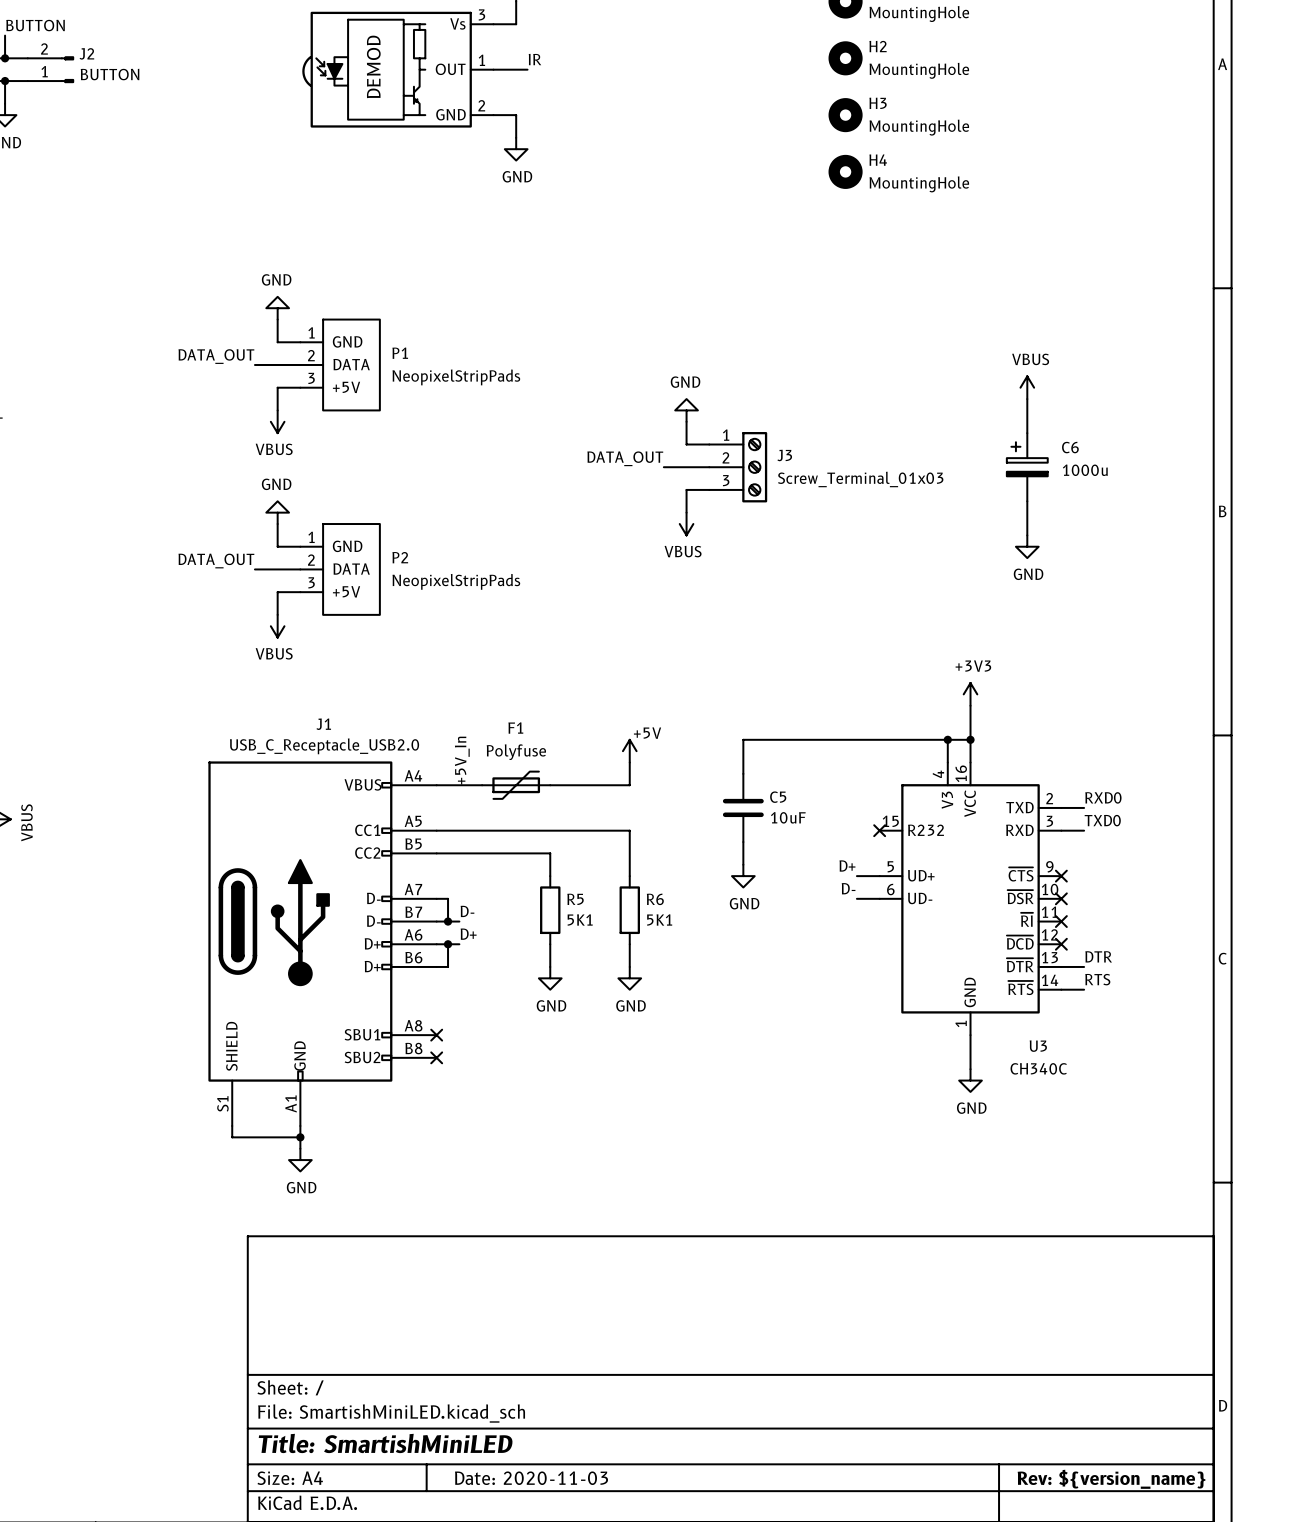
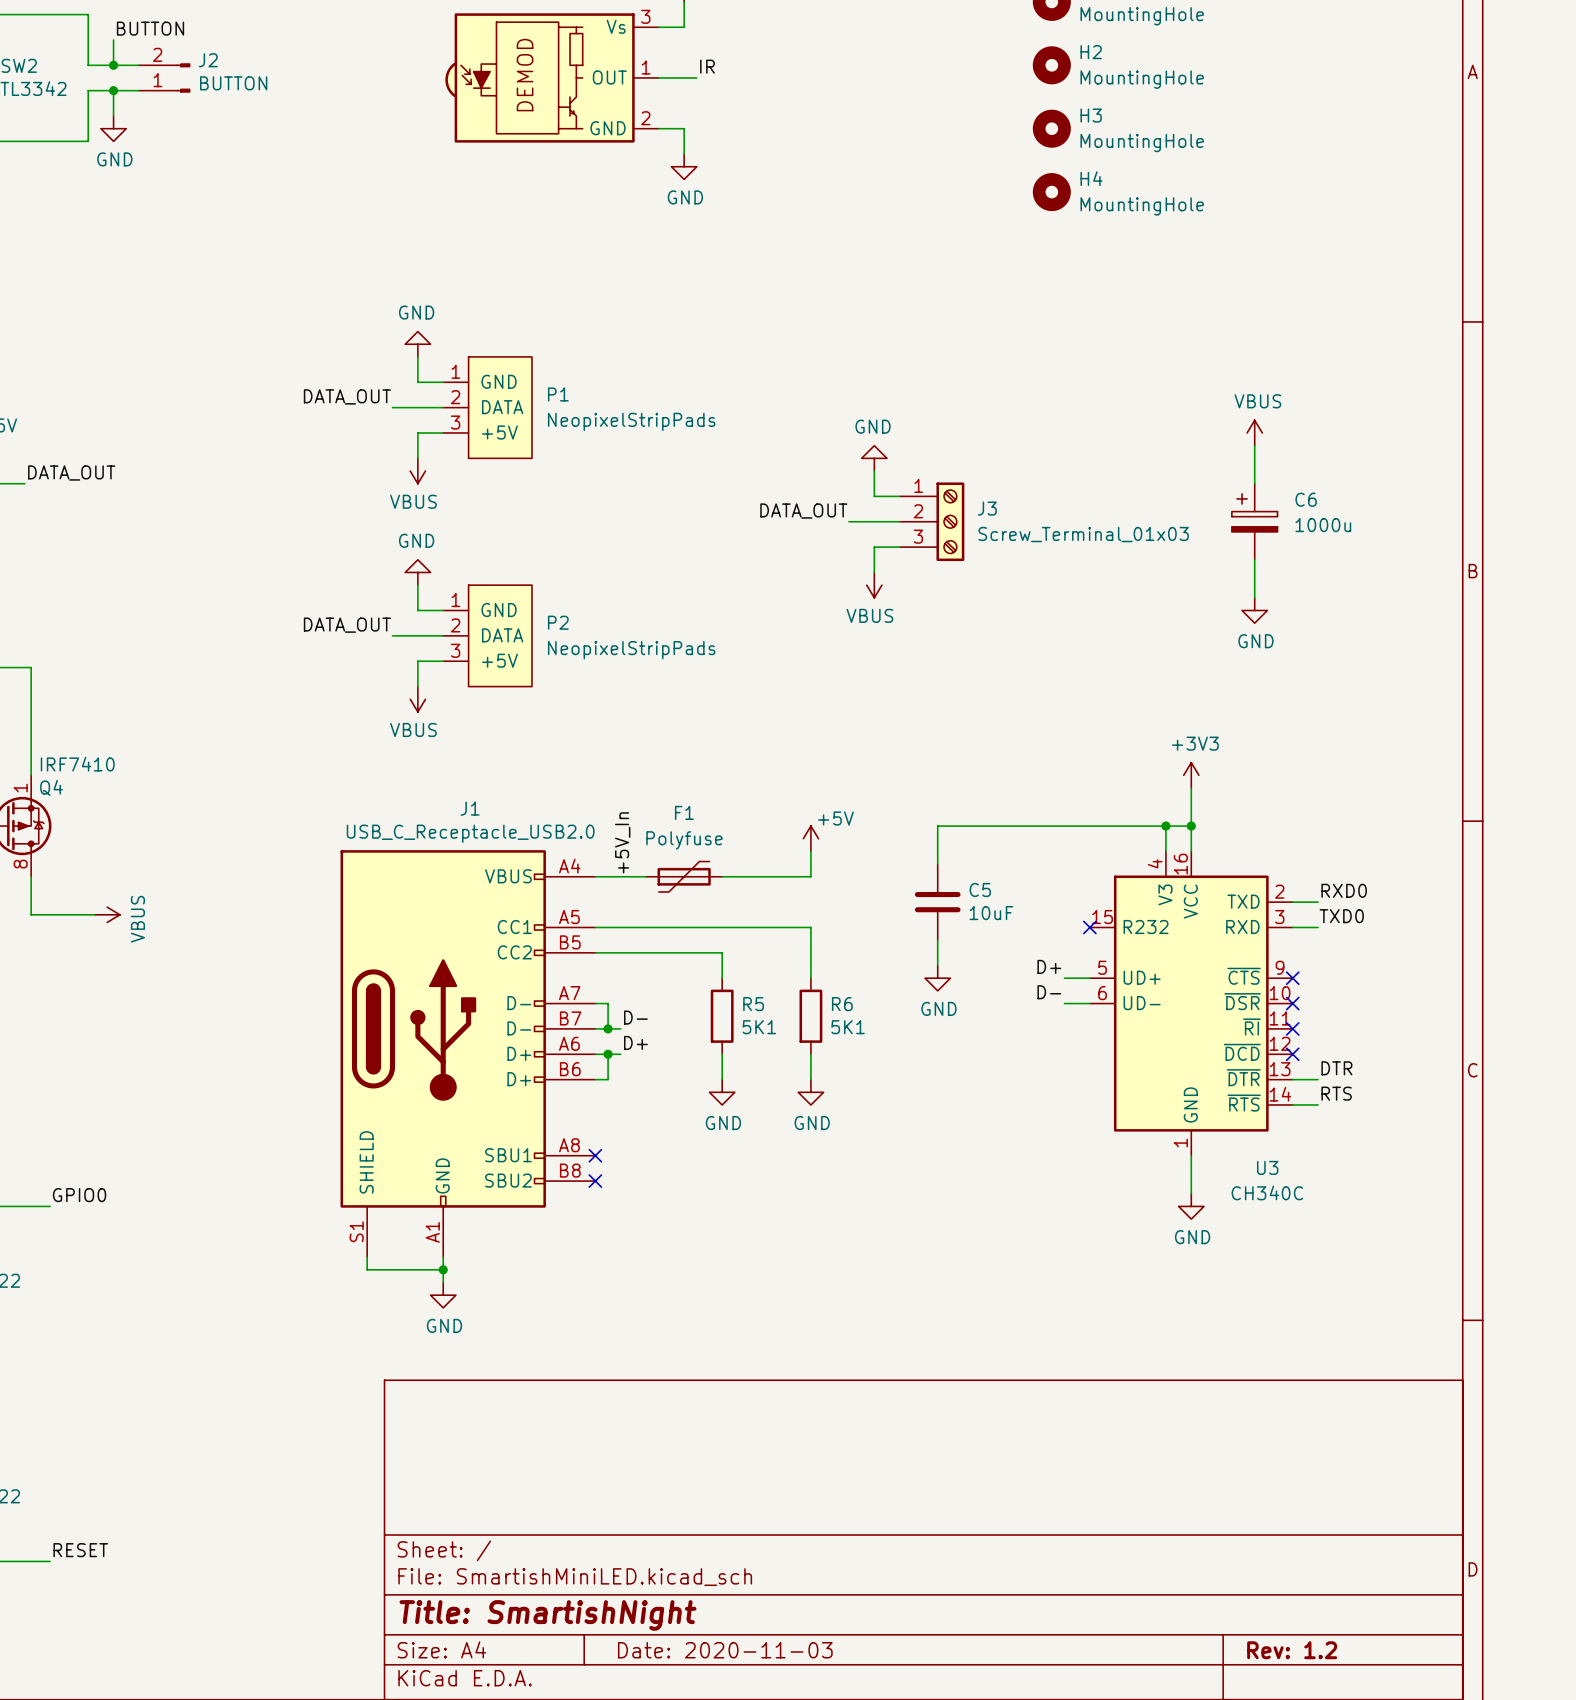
title block: Title: SmartishMiniLED (385, 1443) -> Title: SmartishNight (548, 1615)
title block: Rev: ${version_name} (1111, 1479) -> Rev: 1.2 (1292, 1650)

